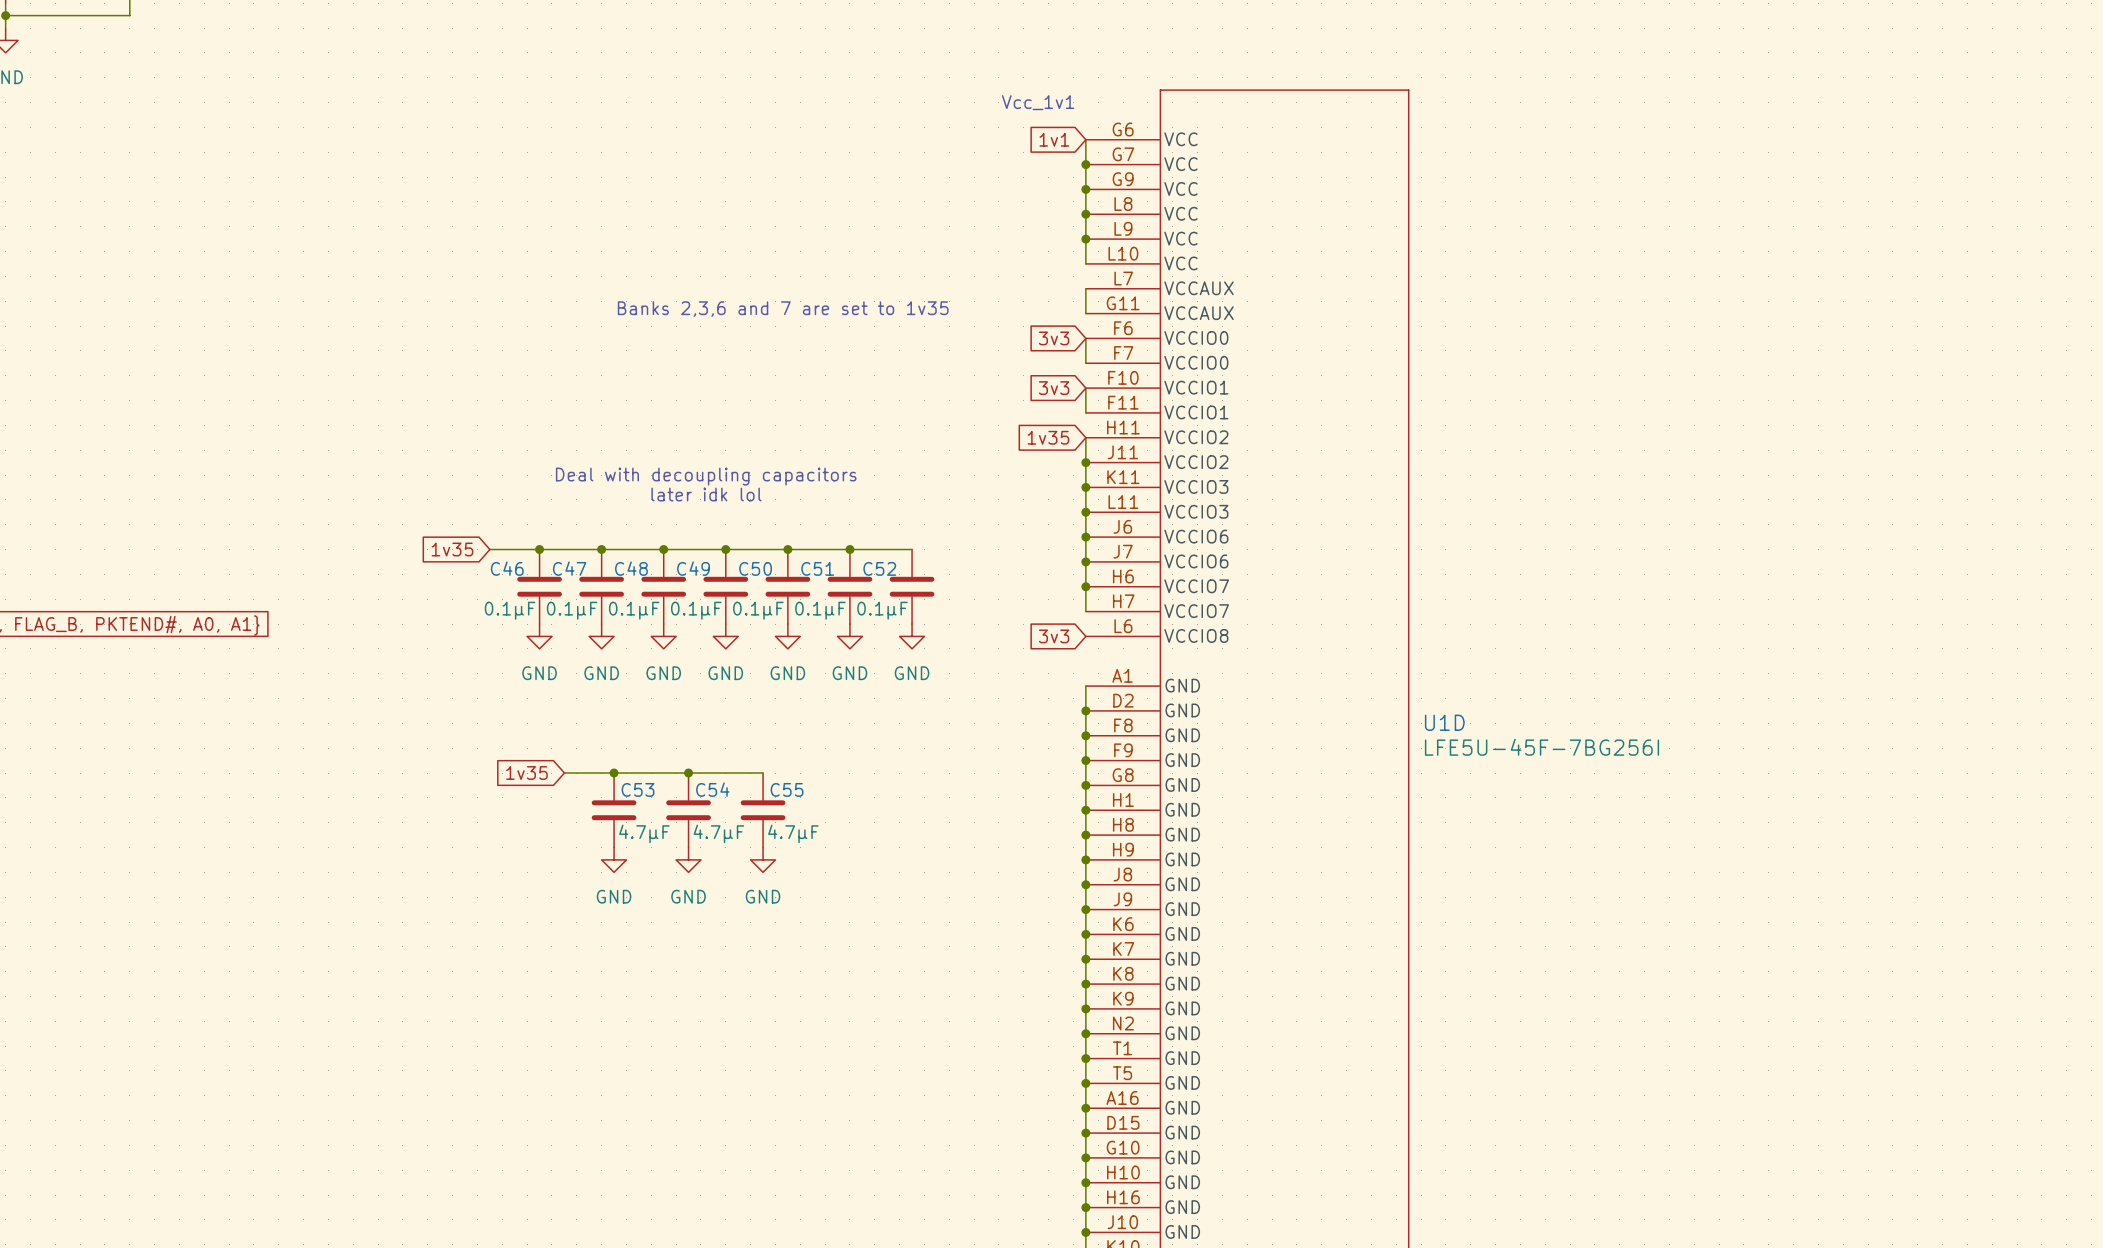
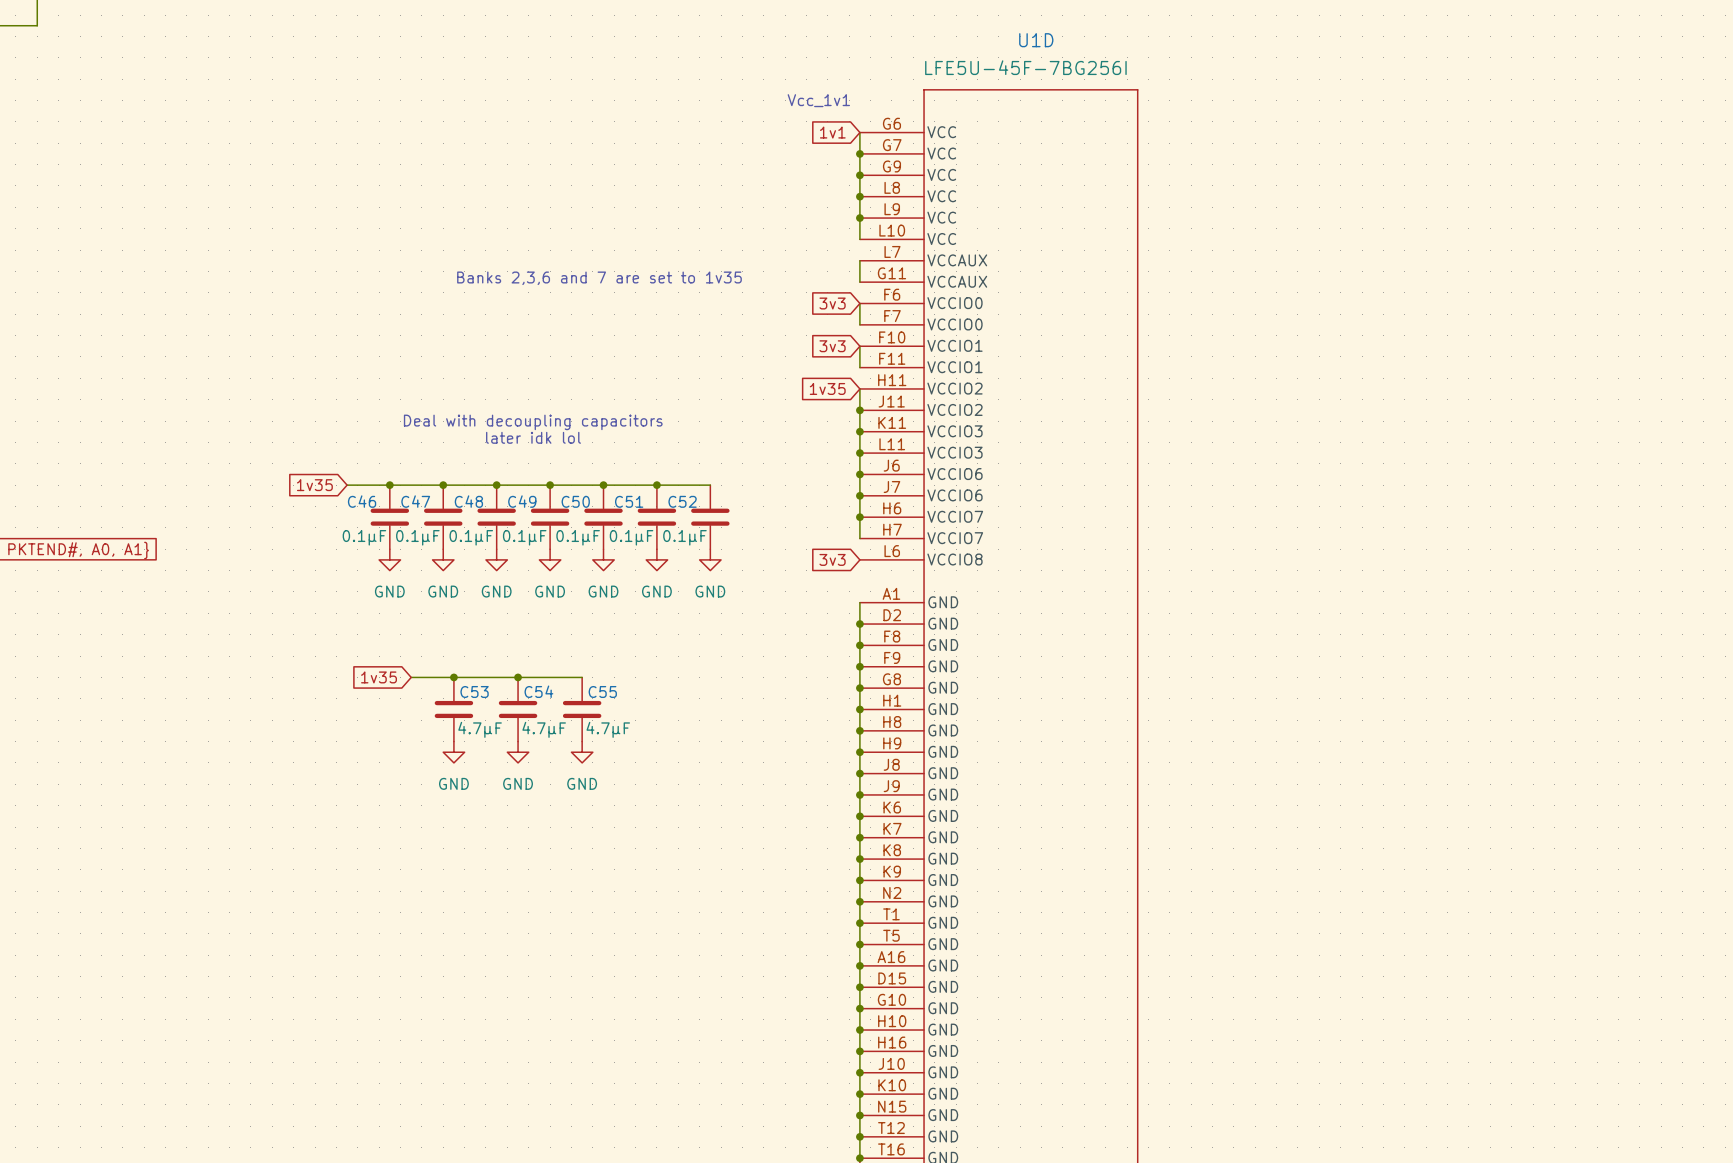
U1D name position: U1D (1444, 722) -> U1D (1036, 40)
U1D value position: LFE5U-45F-7BG256I (1542, 747) -> LFE5U-45F-7BG256I (1025, 67)

